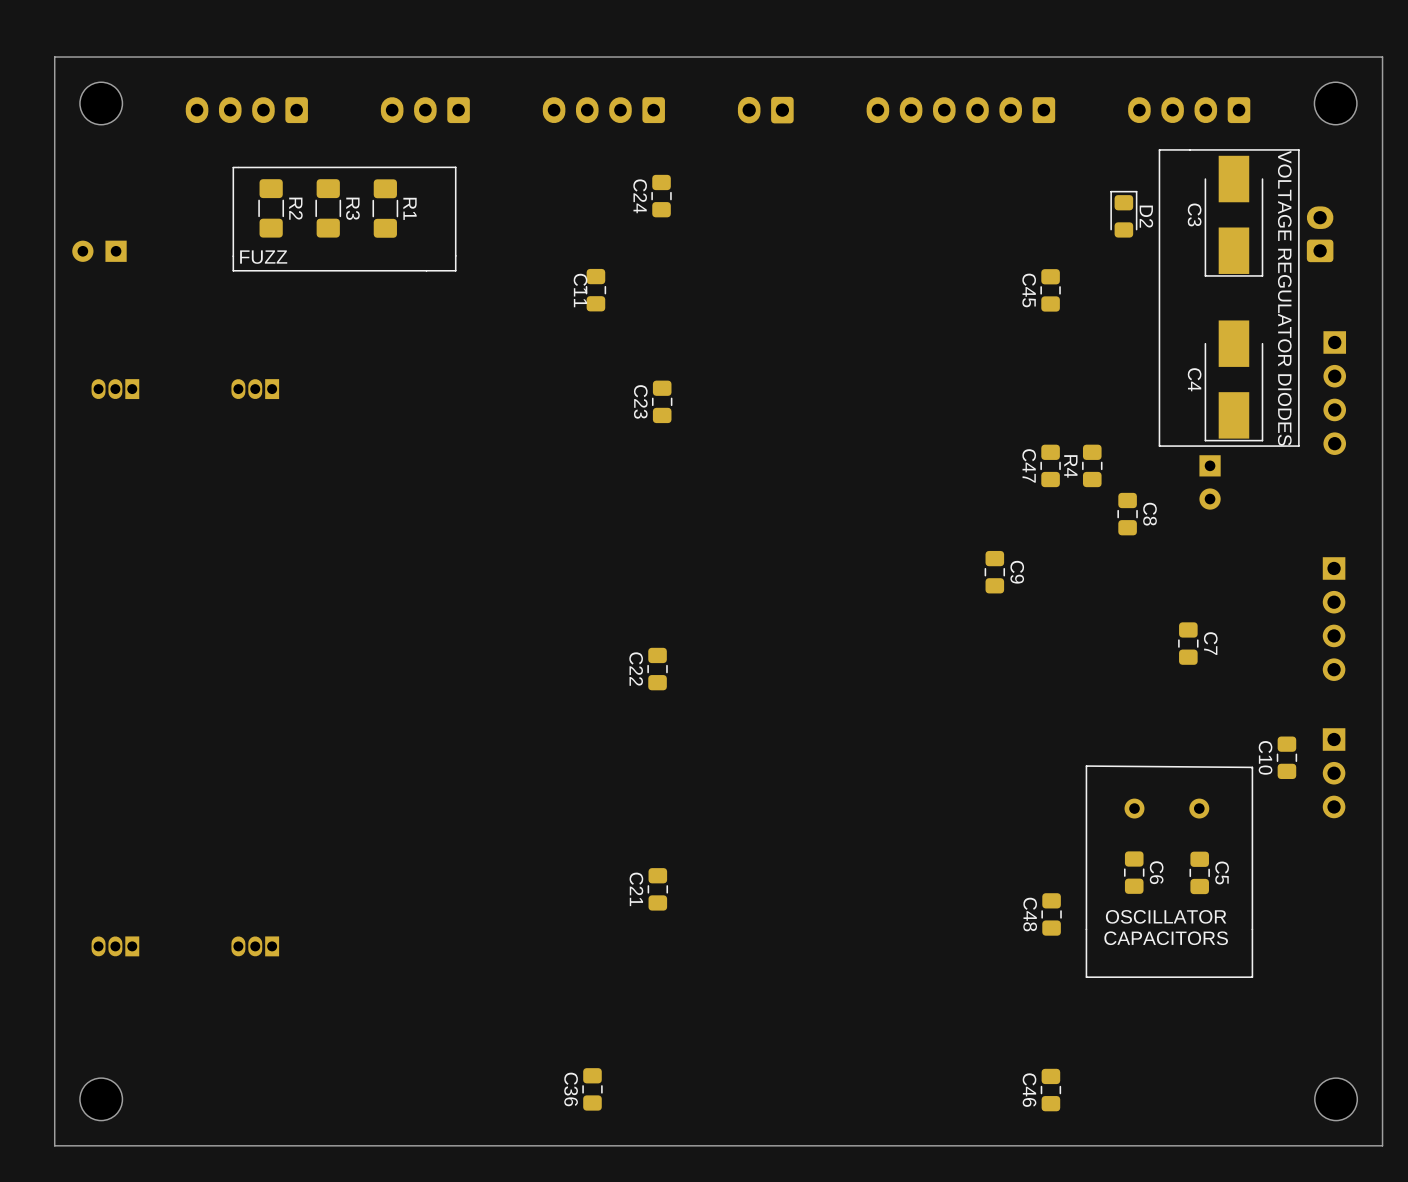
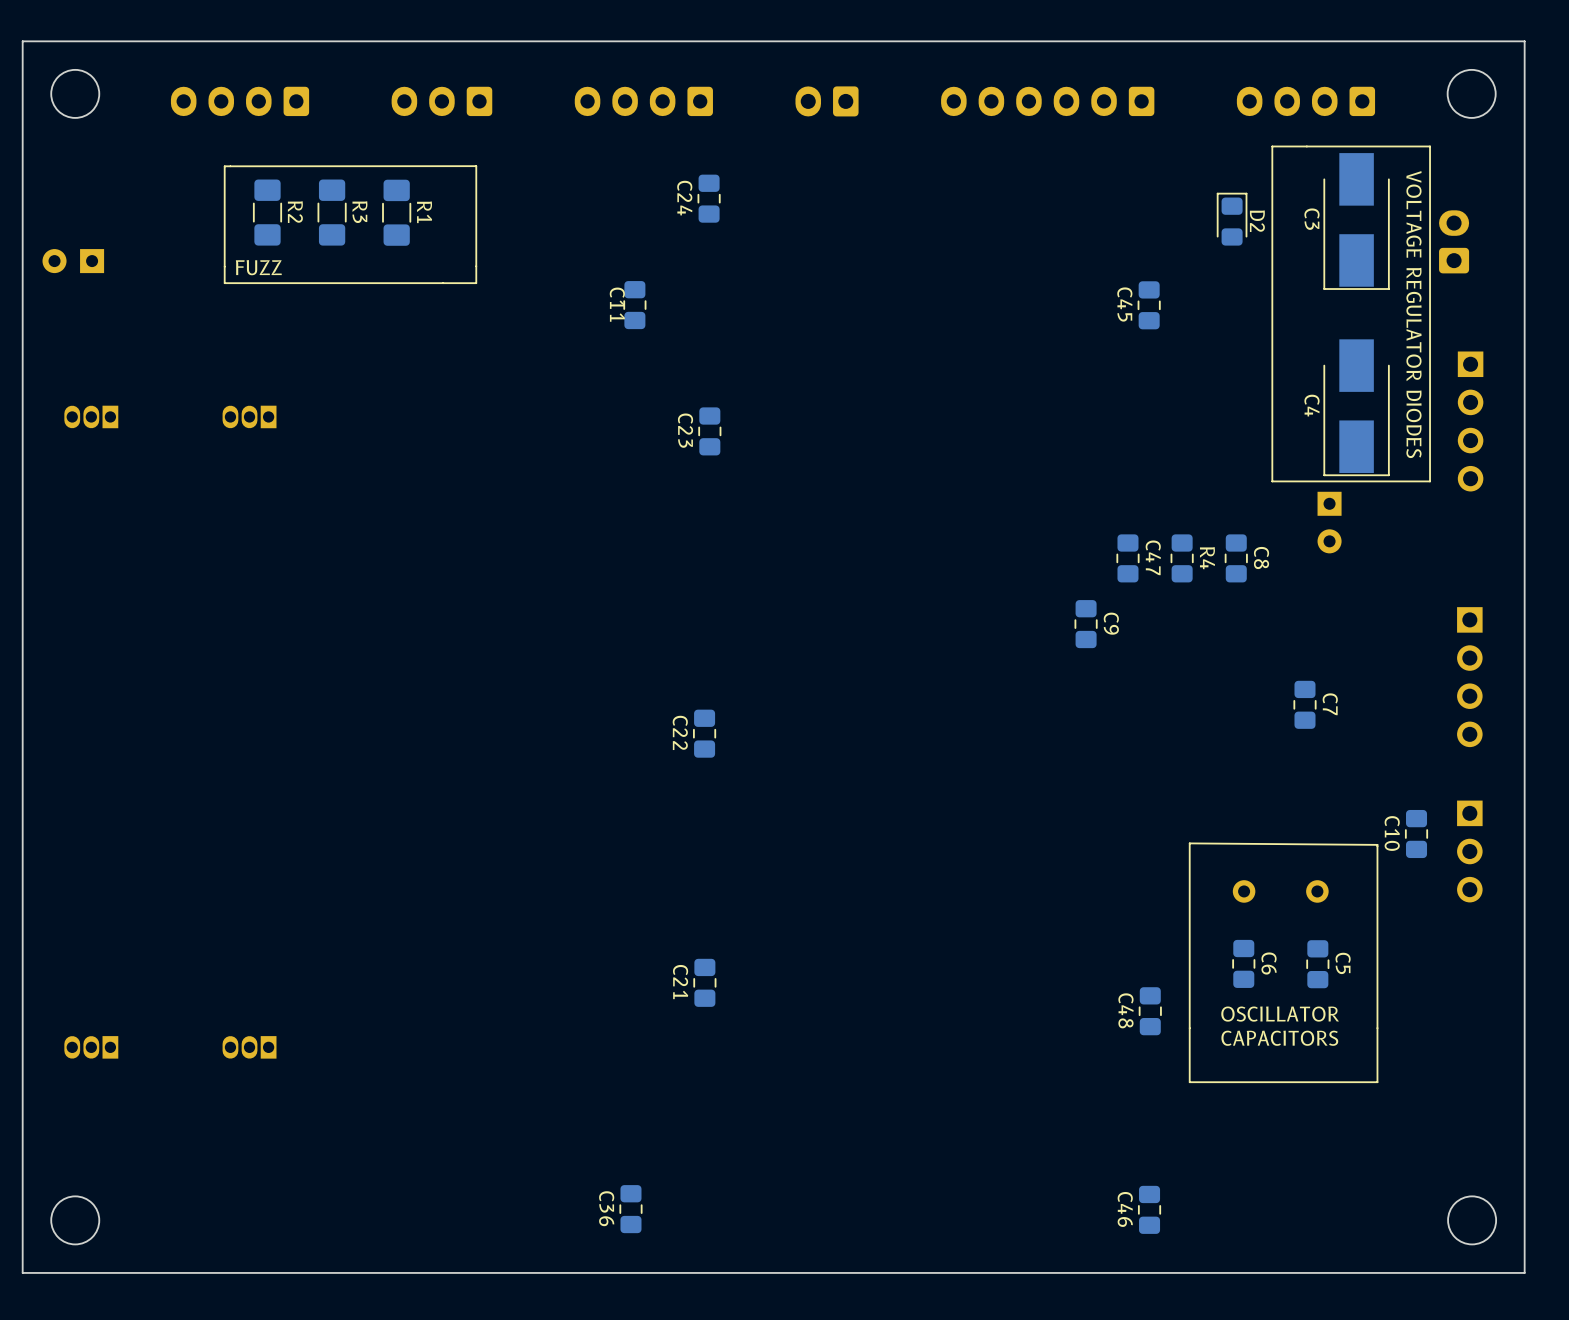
C47 name position: C47 (1029, 465) -> C47 (1153, 557)
C47 position: (1050, 465) -> (1127, 558)
R4 position: (1092, 465) -> (1182, 558)
R4 name position: R4 (1070, 466) -> R4 (1207, 558)

